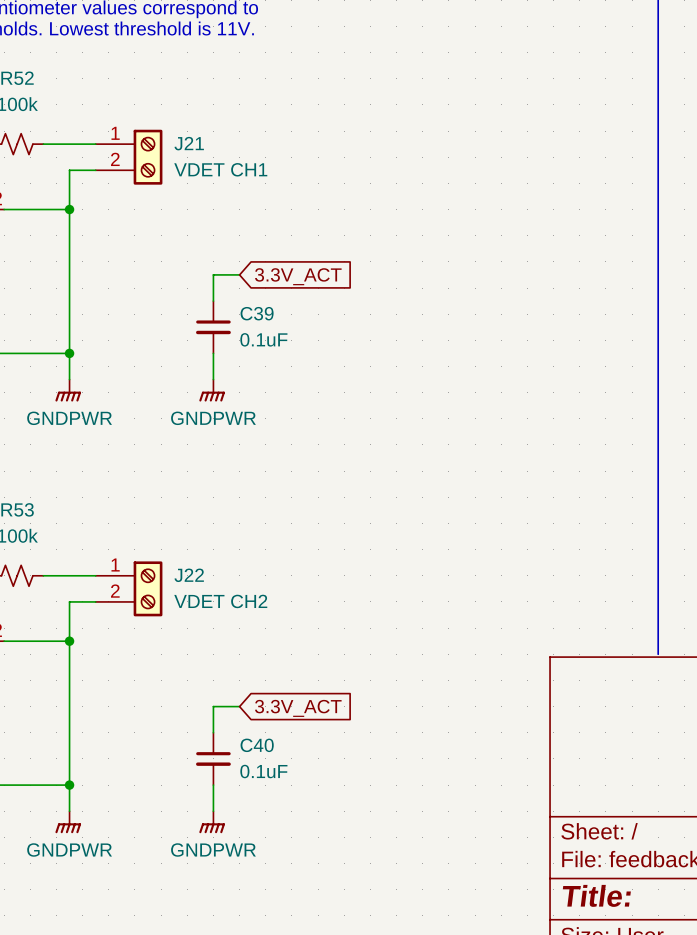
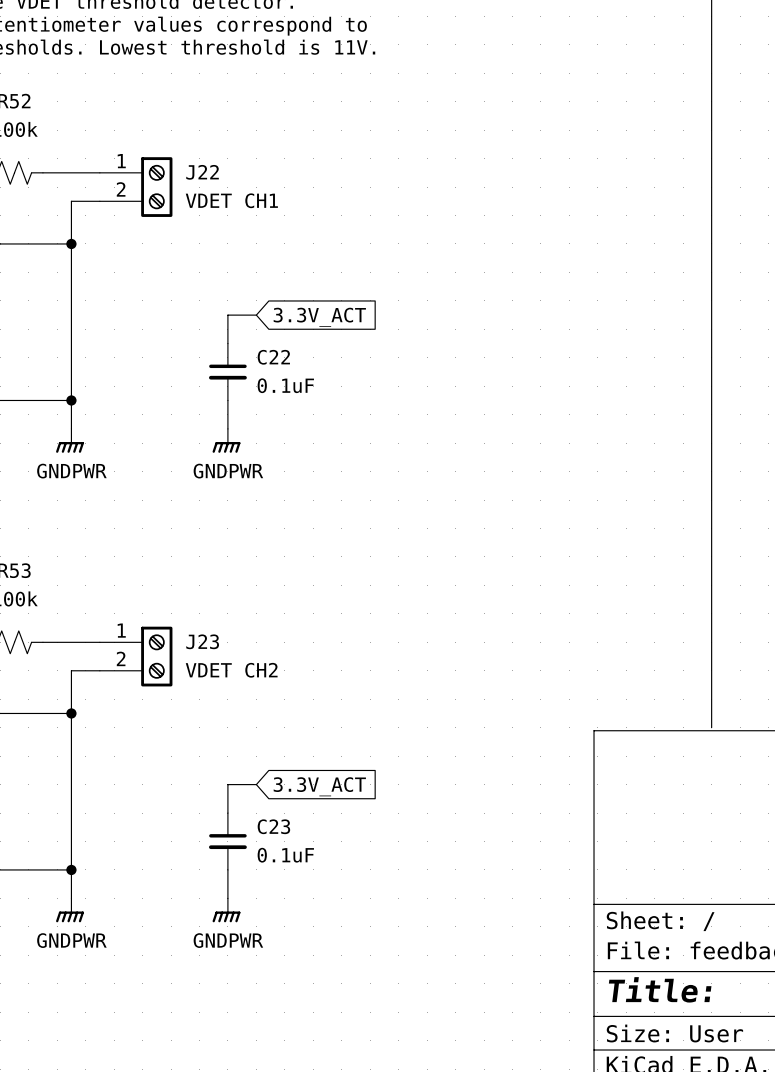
J21 name: J21 (189, 143) -> J22 (202, 172)
C39 name: C39 (257, 313) -> C22 (273, 357)
J22 name: J22 (189, 575) -> J23 (202, 641)
C40 name: C40 (257, 745) -> C23 (273, 826)

